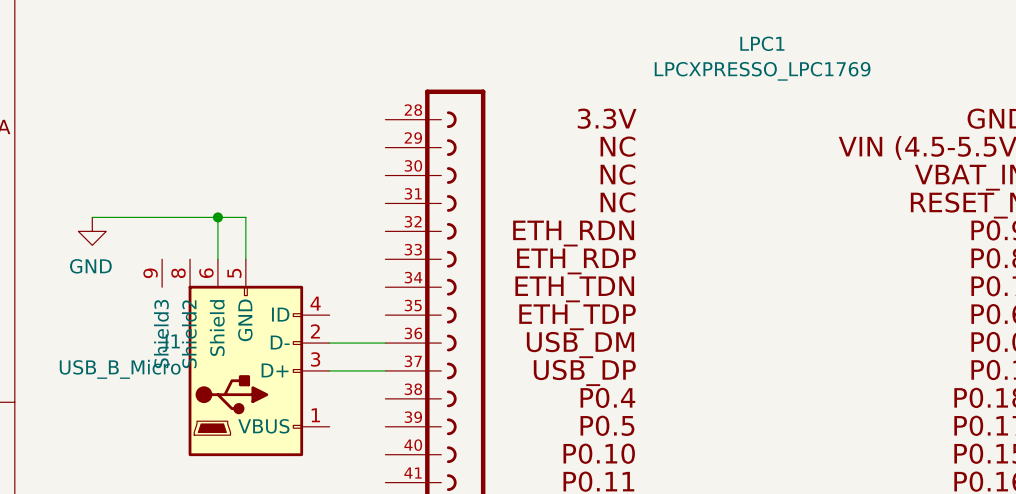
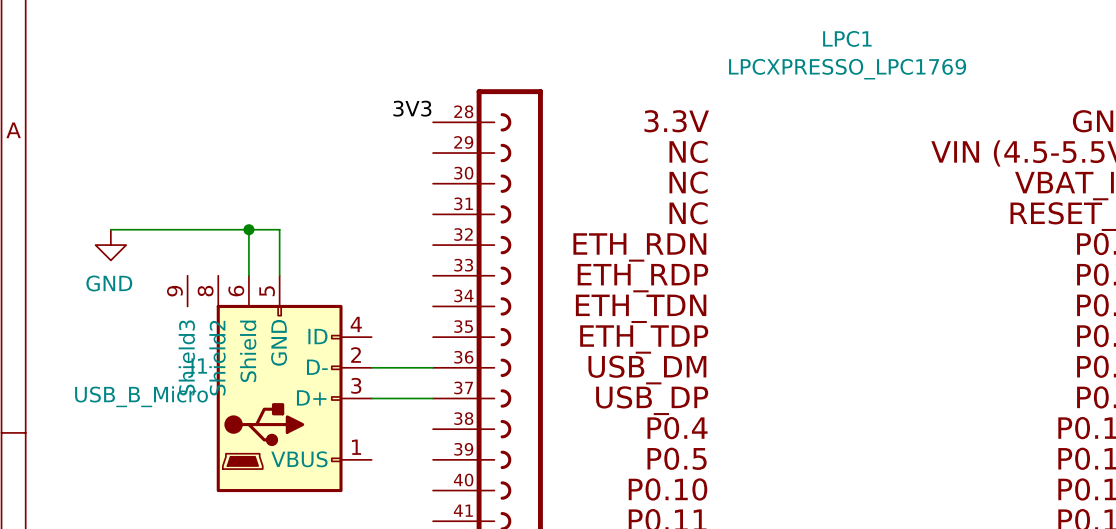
label: none -> 3V3 (412, 108)

